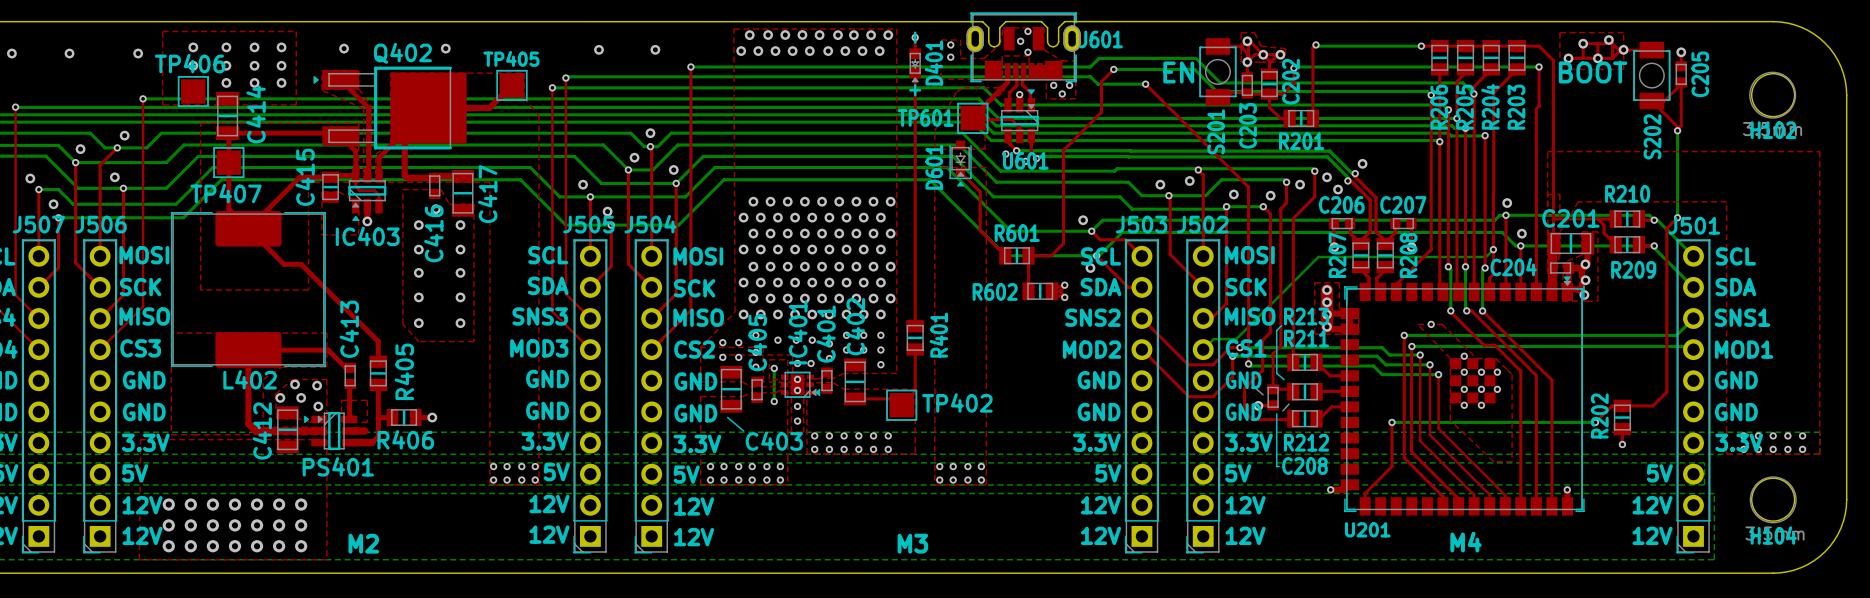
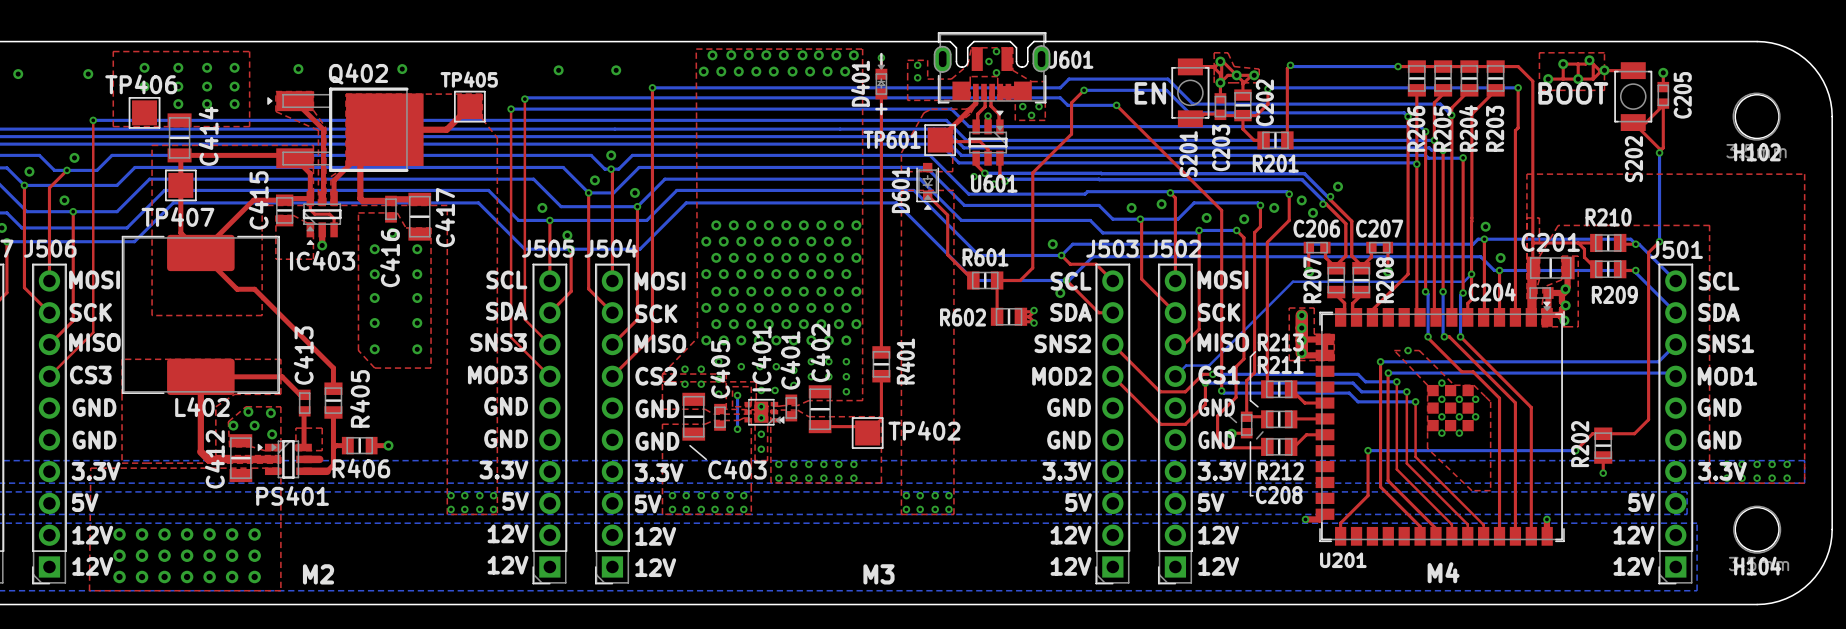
D401 footprint: [909, 31, 922, 97] -> [875, 52, 888, 116]
D401 name position: D401 (933, 63) -> D401 (860, 83)

